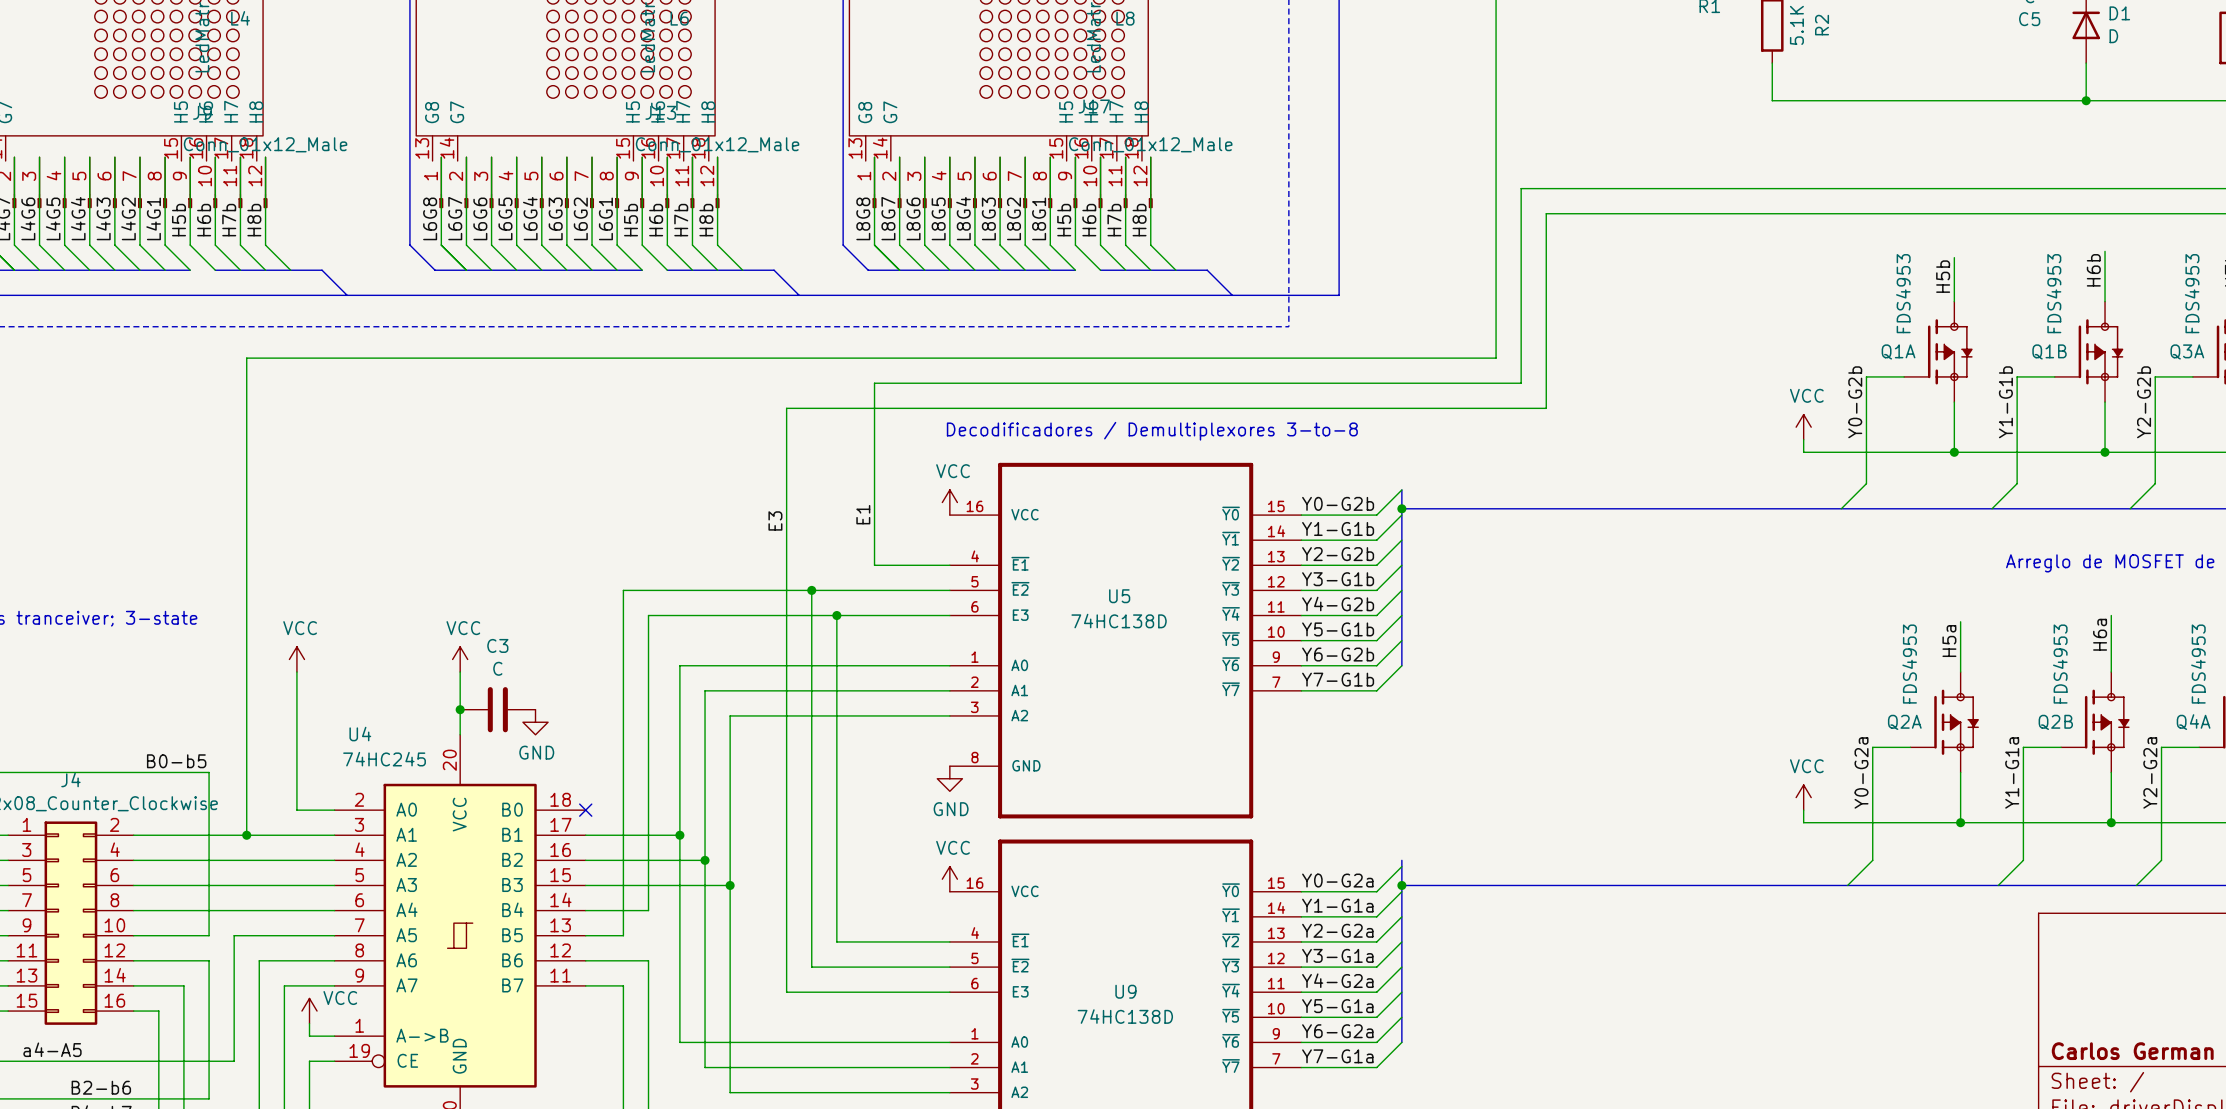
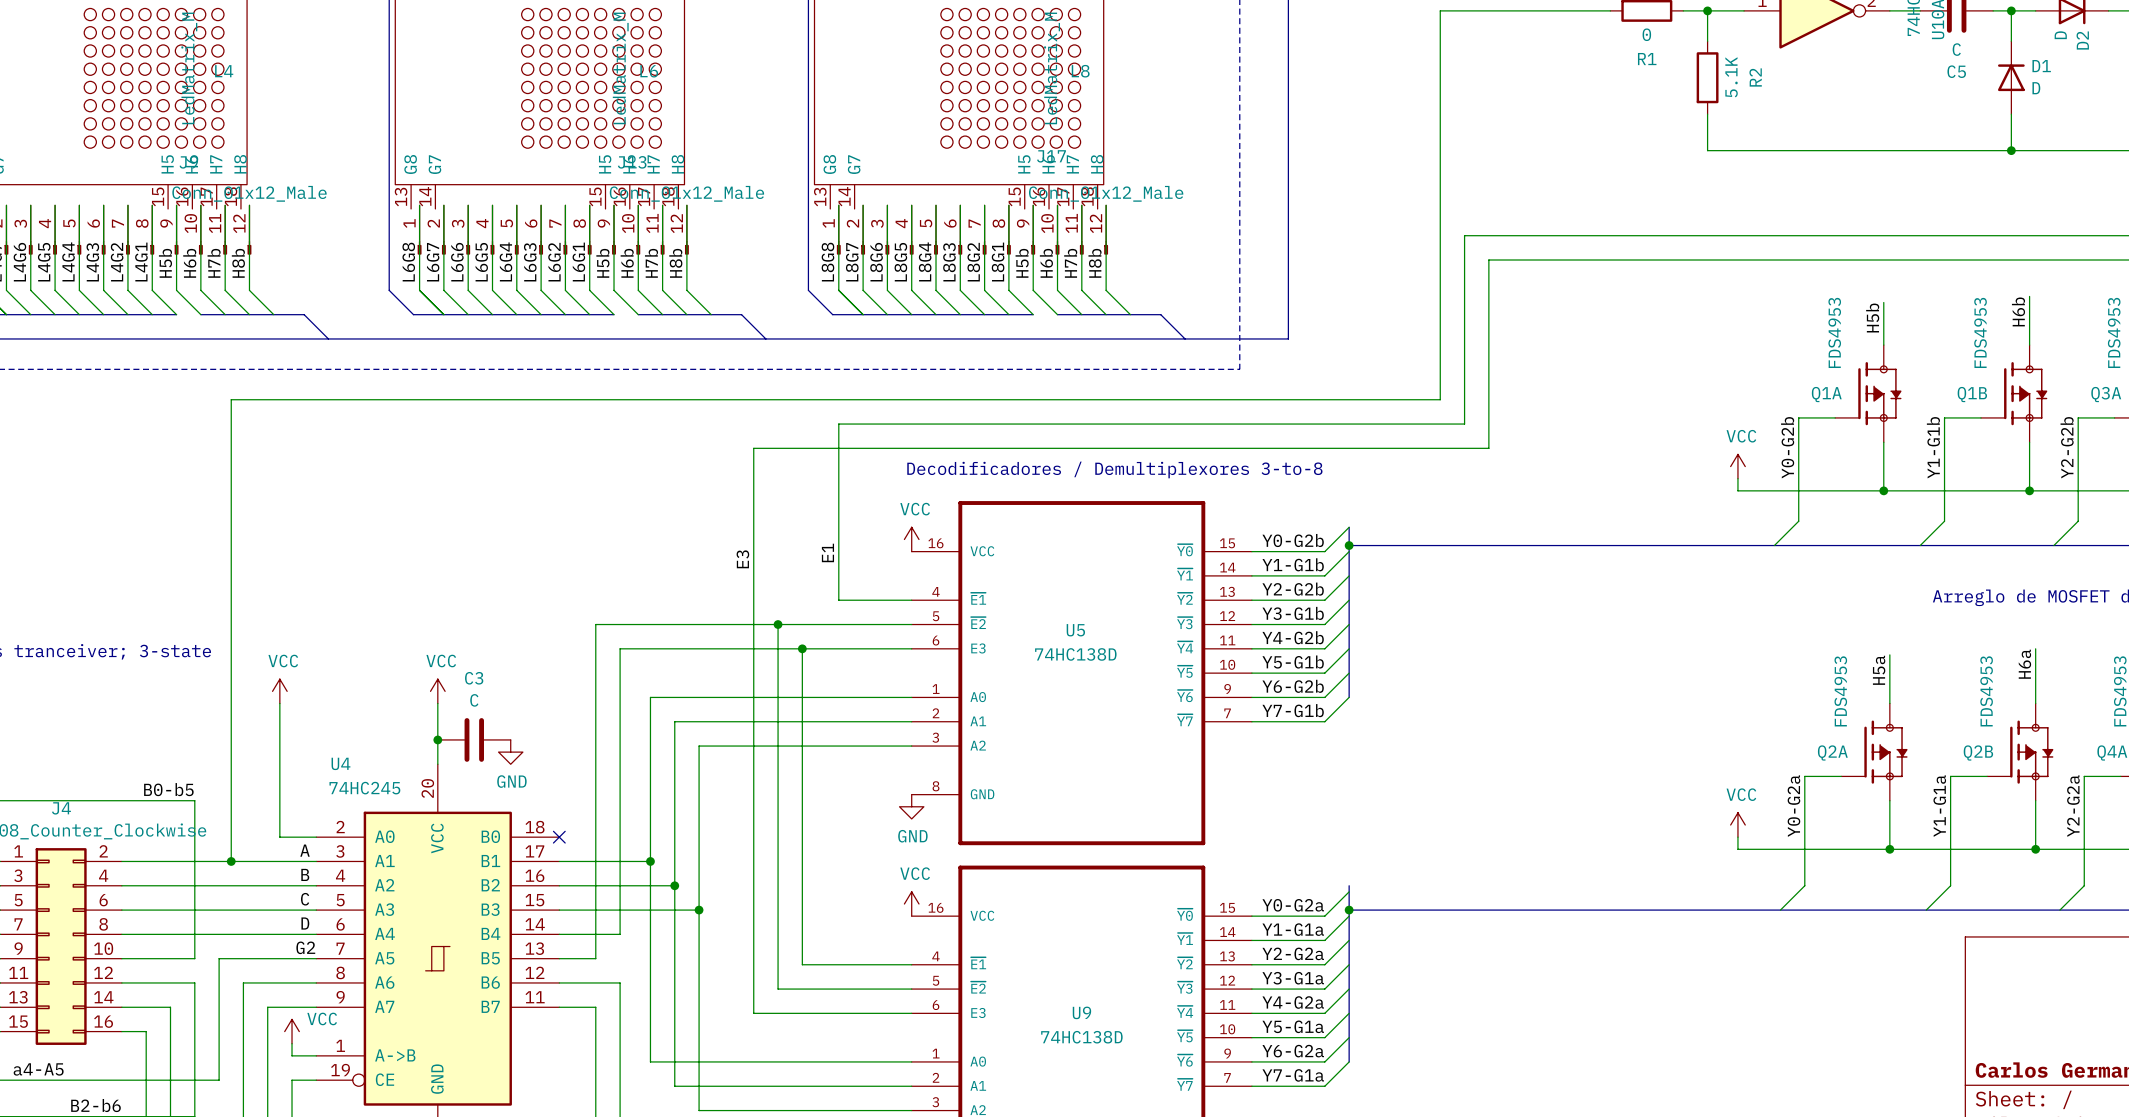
label: none -> A (305, 850)
label: none -> B (305, 874)
label: none -> C (305, 899)
label: none -> D (305, 923)
label: none -> G2 (305, 947)

